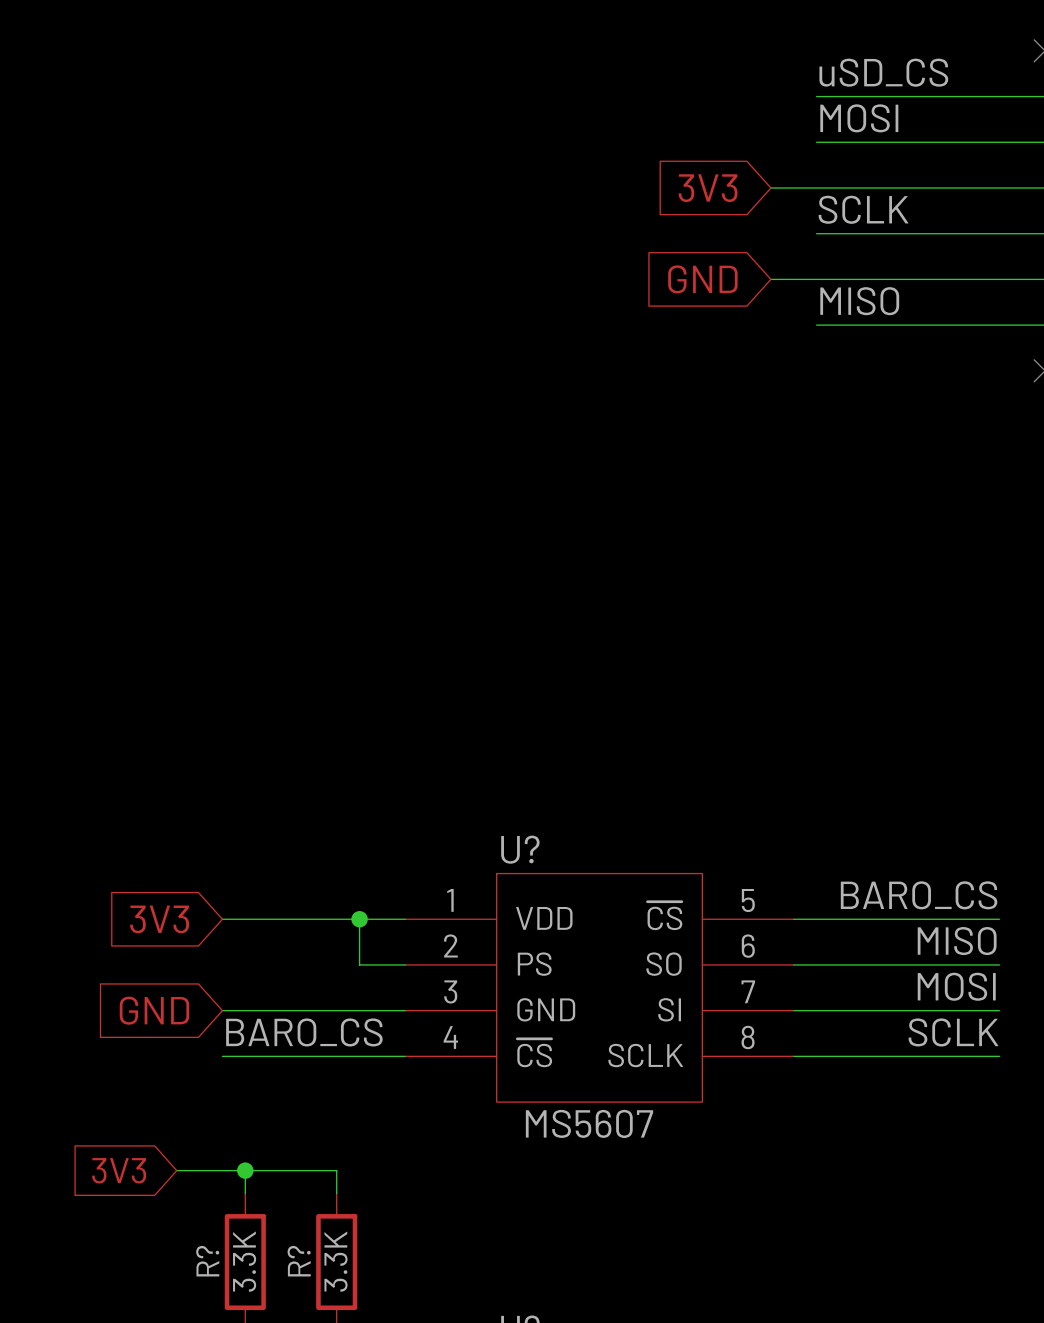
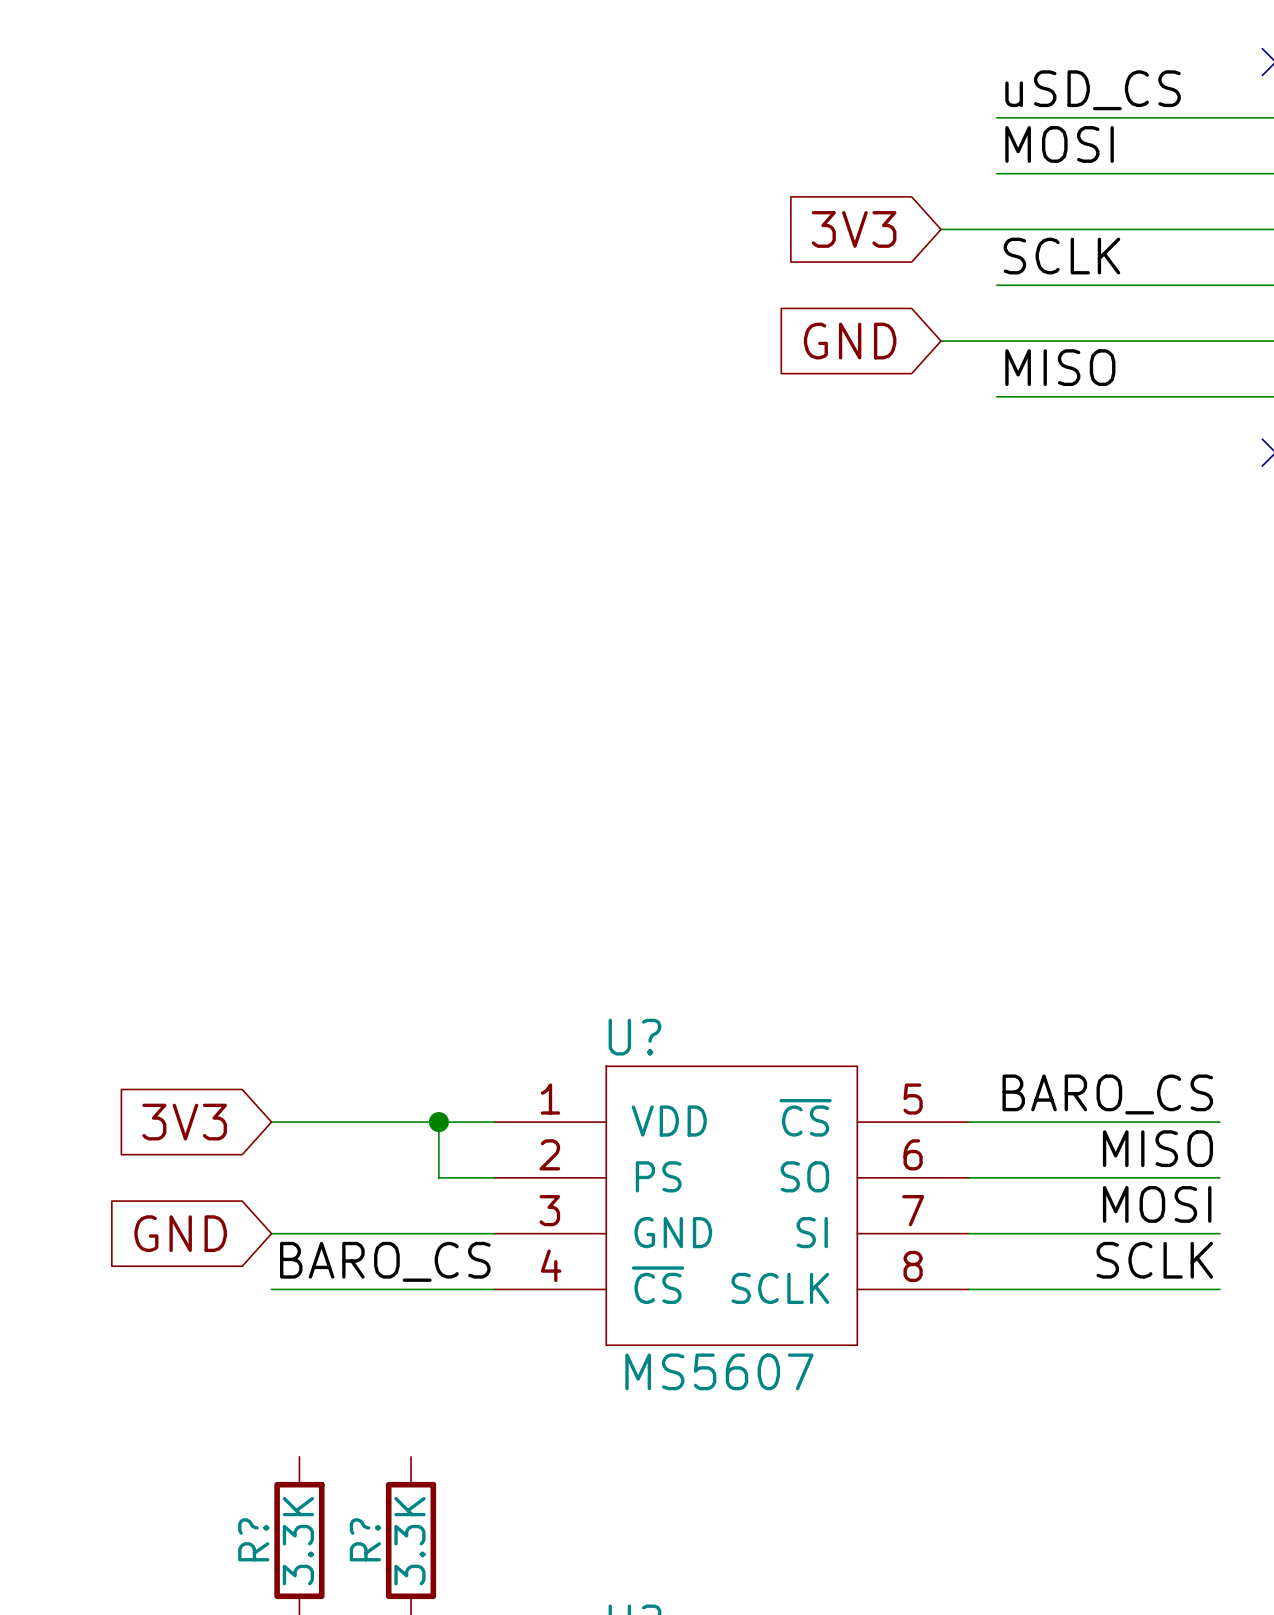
global label: 3V3 (119, 1170) -> none
wire: (176, 1170) (336, 1170) (336, 1193) -> none
wire: (245, 1170) (245, 1193) -> none
junction: (245, 1170) -> none

